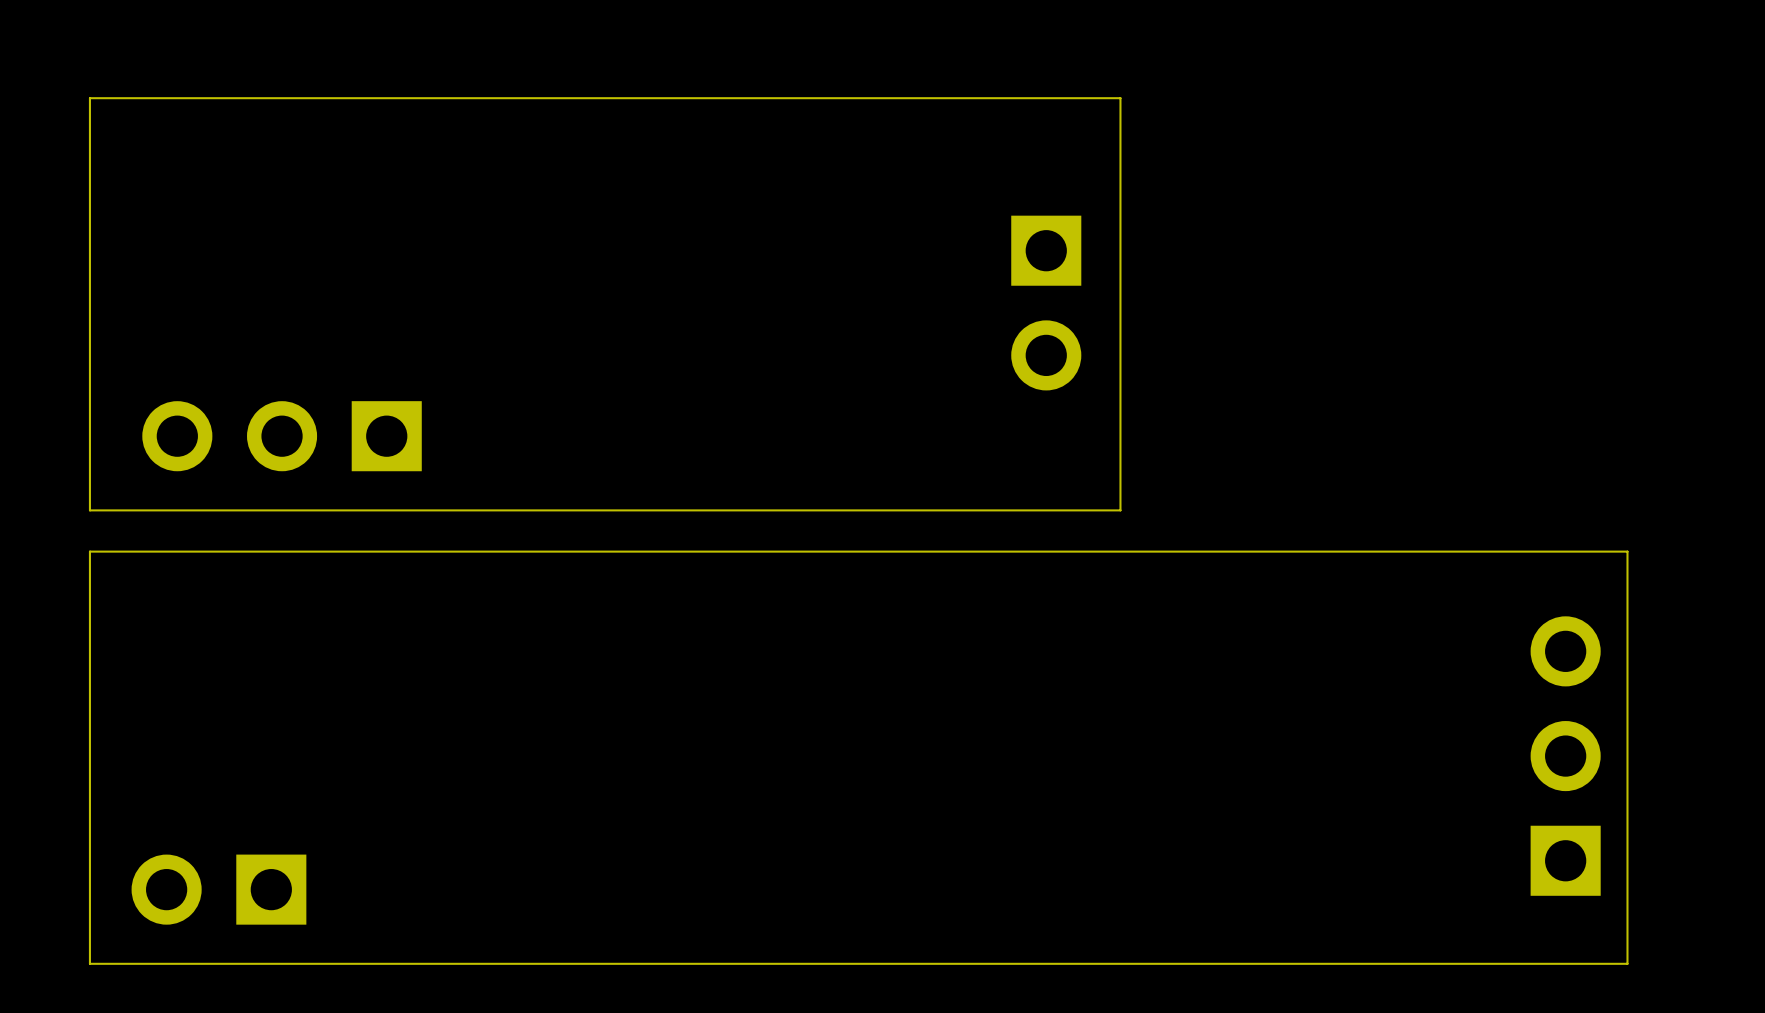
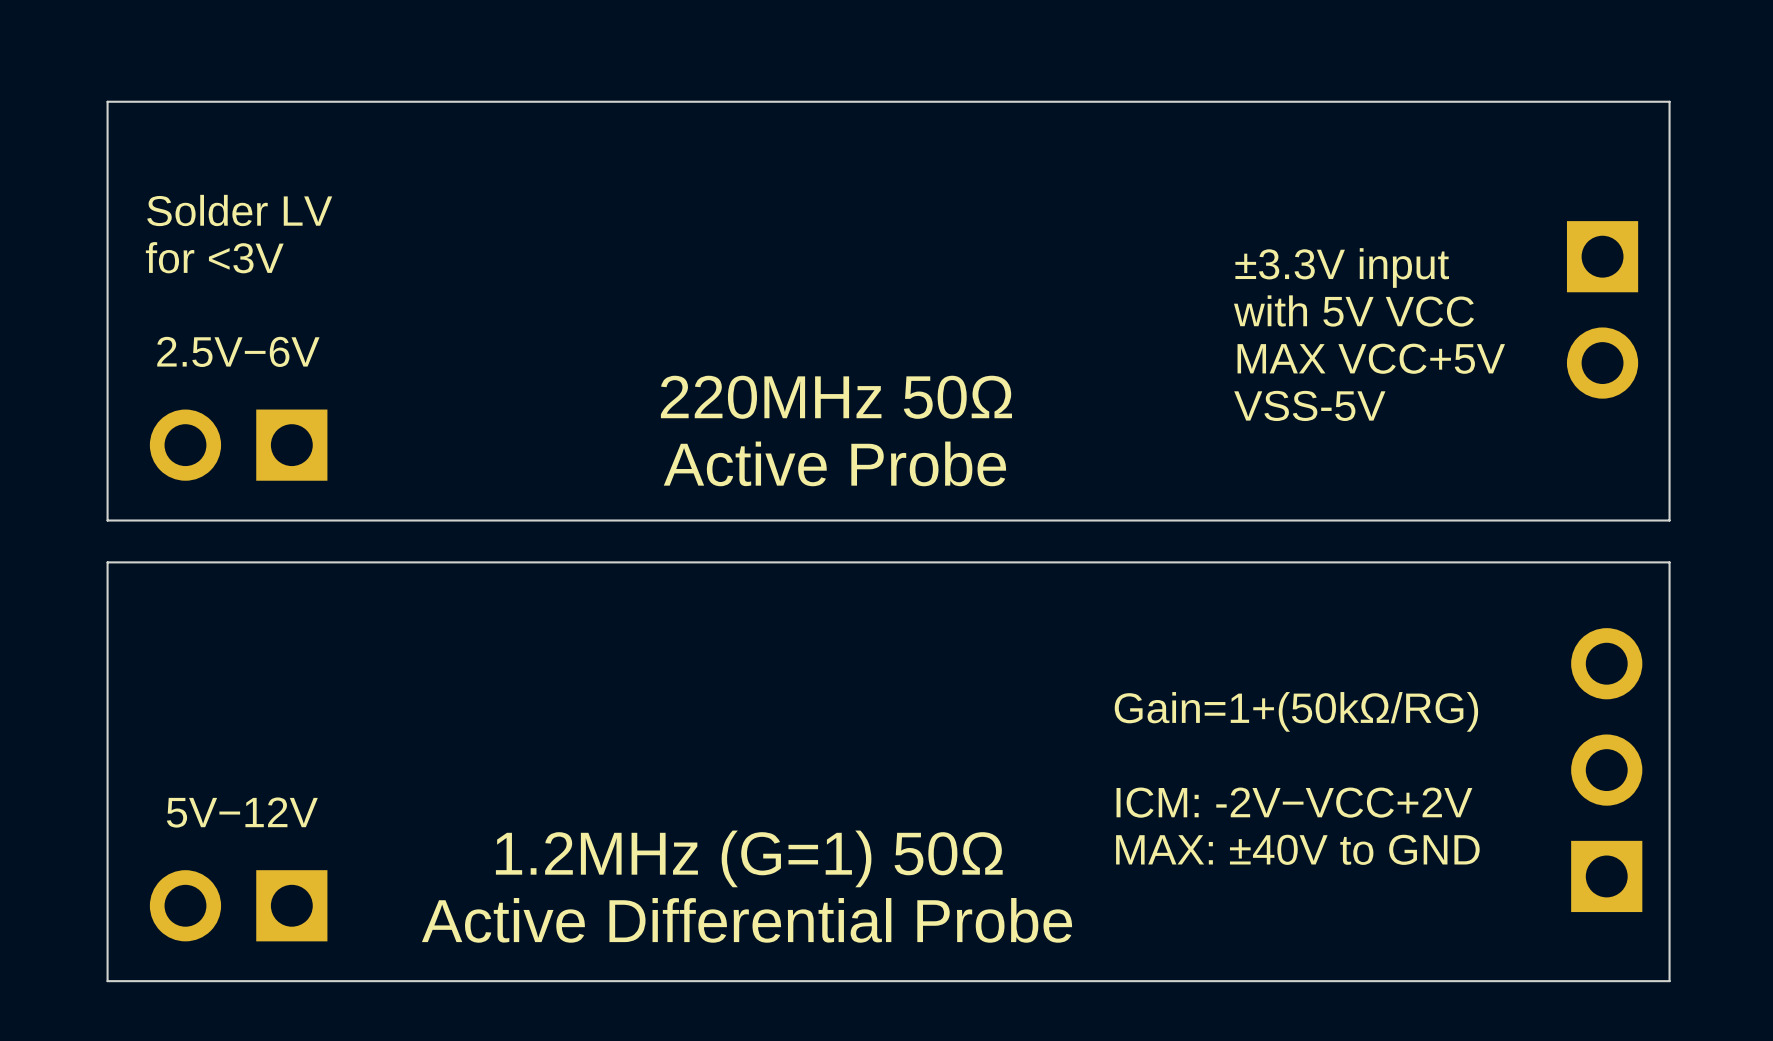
board edge: (1120, 98) (1120, 510) -> (1154, 101) (1669, 101) (1669, 520) (1154, 520)
text: none -> Solder LV (239, 210)
text: none -> for <3V (214, 257)
text: none -> ±3.3V input (1342, 268)
part: (1046, 303) -> none
part: none -> (1602, 309)
text: none -> with 5V VCC (1353, 310)
text: none -> 2.5V−6V (238, 351)
text: none -> MAX VCC+5V (1371, 358)
text: none -> 220MHz 50Ω (836, 397)
text: none -> VSS-5V (1309, 405)
part: none -> (238, 445)
part: (282, 436) -> none
text: none -> Active Probe (834, 463)
text: none -> Gain=1+(50kΩ/RG) (1296, 711)
text: none -> ICM: -2V−VCC+2V (1294, 802)
text: none -> 5V−12V (242, 812)
text: none -> MAX: ±40V to GND (1297, 849)
text: none -> 1.2MHz (G=1) 50Ω (749, 858)
text: none -> Active Differential Probe (746, 920)

